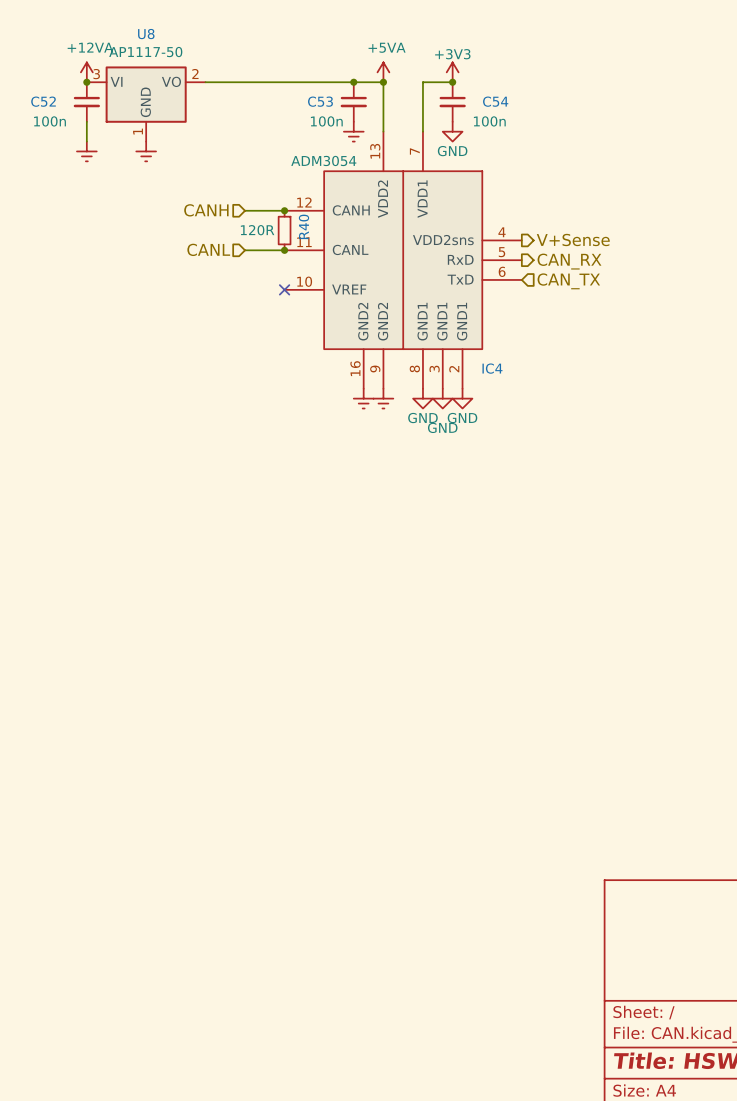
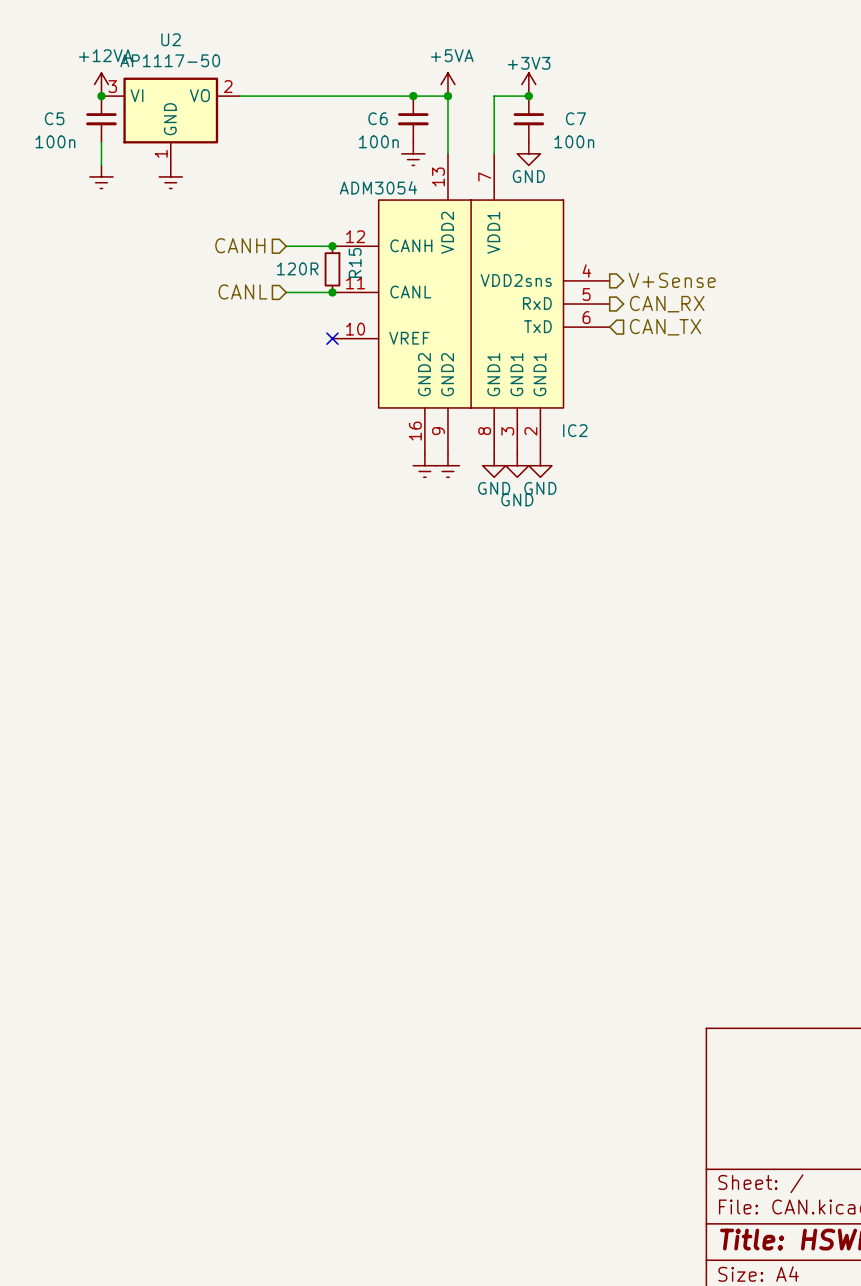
U8 name: U8 (146, 34) -> U2 (171, 39)
C52 name: C52 (43, 101) -> C5 (54, 118)
C53 name: C53 (320, 101) -> C6 (378, 118)
C54 name: C54 (495, 101) -> C7 (575, 118)
R40 name: R40 (303, 226) -> R15 (355, 262)
IC4 name: IC4 (492, 368) -> IC2 (575, 430)

